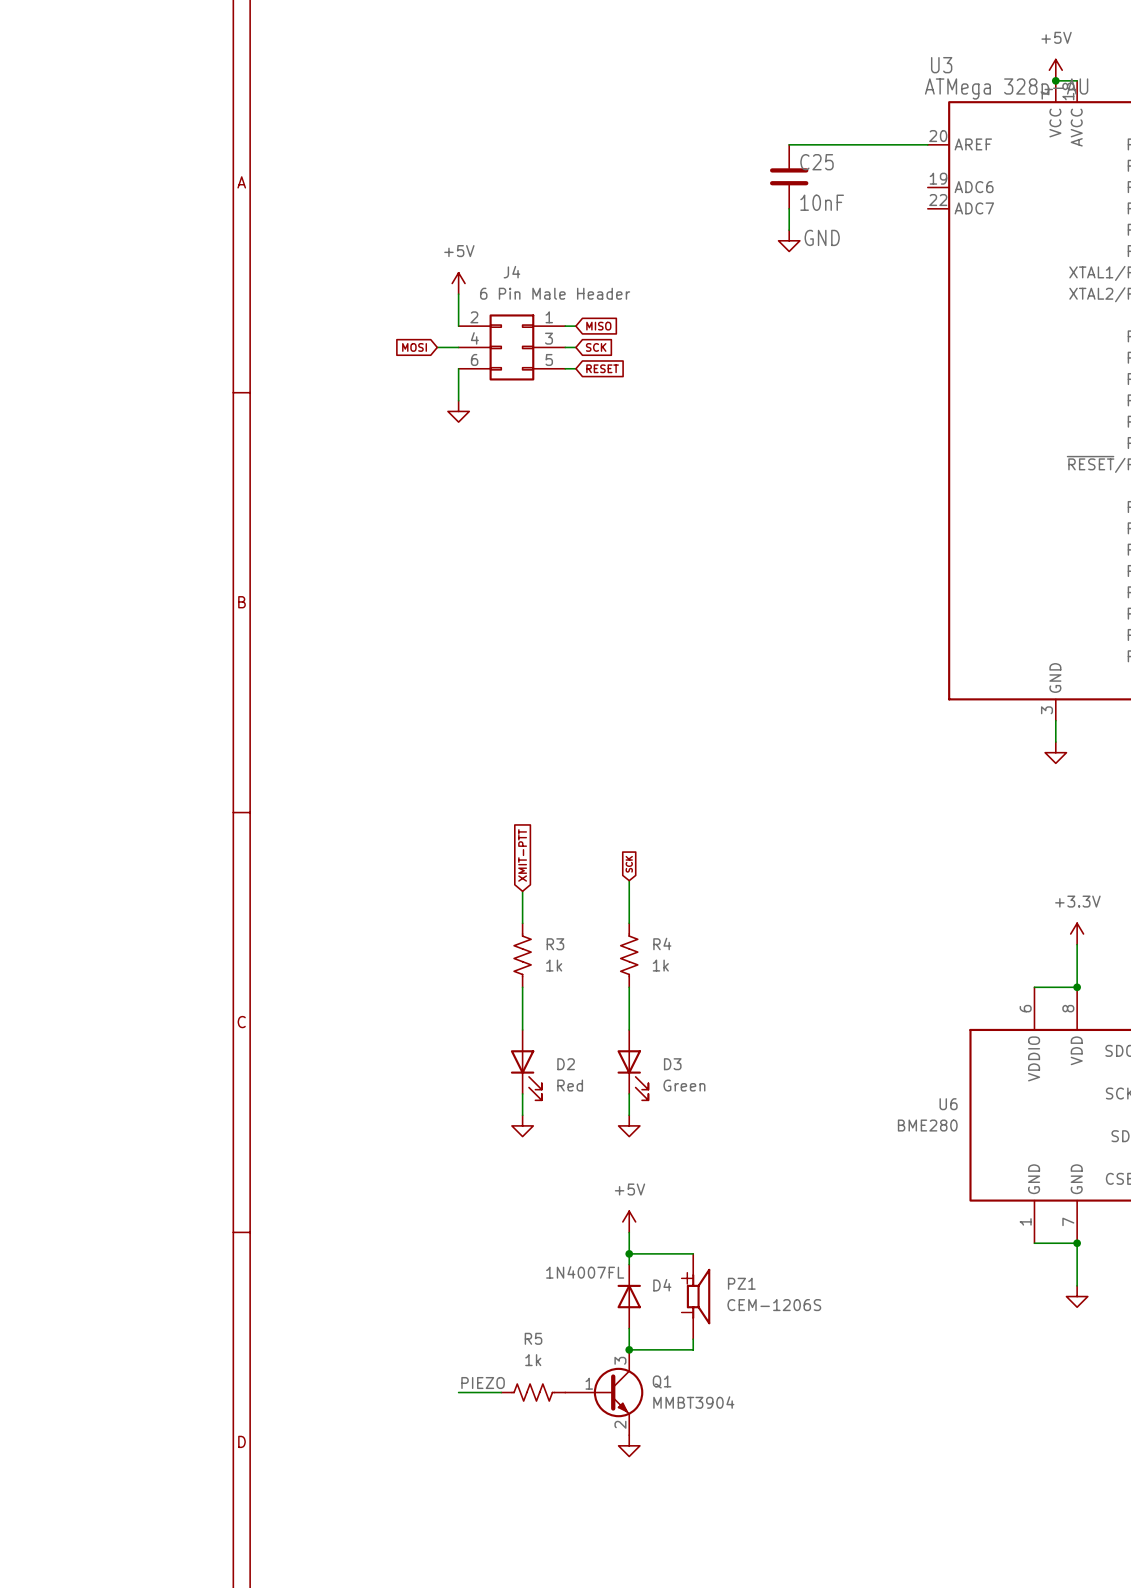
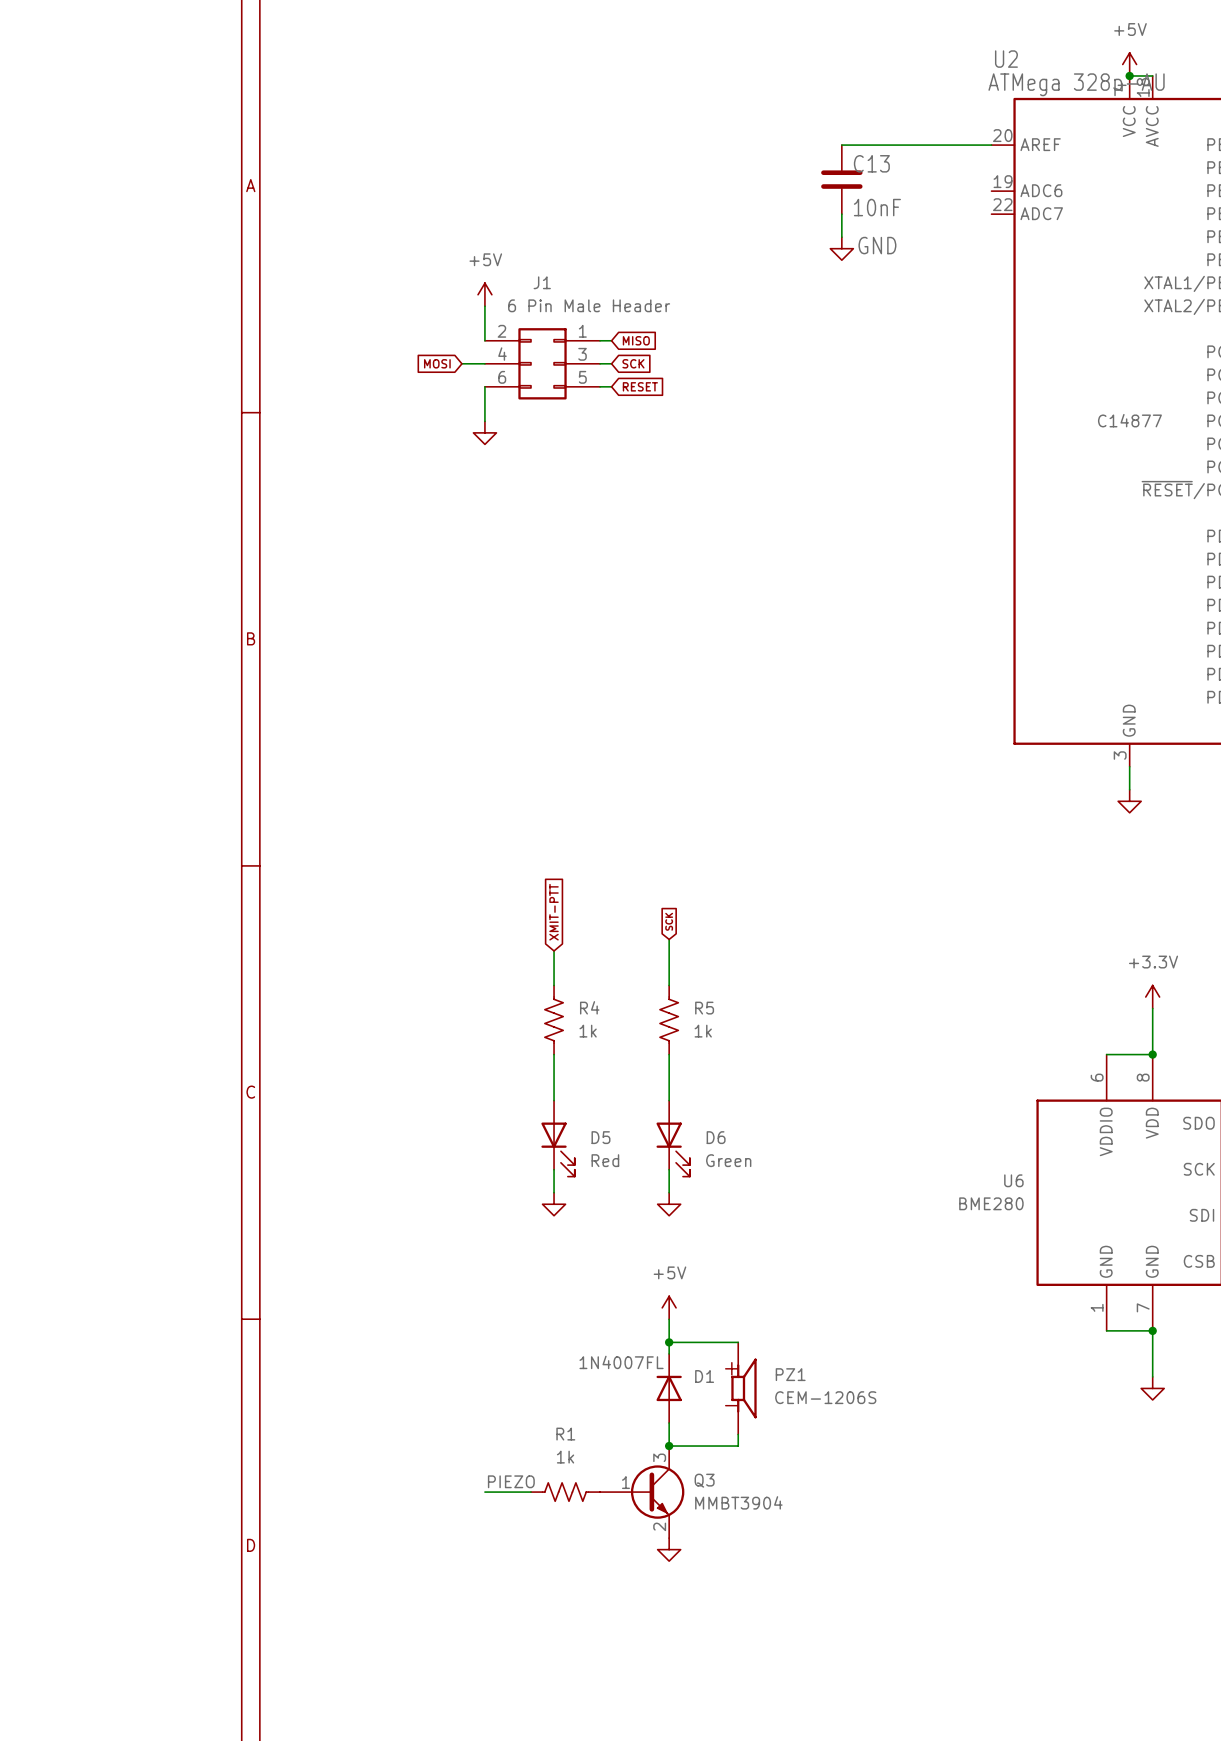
U3 name: U3 (941, 65) -> U2 (1006, 59)
C25 name: C25 (817, 162) -> C13 (871, 163)
J4 name: J4 (511, 272) -> J1 (542, 282)
U3 text: none -> C14877 (1129, 420)
R4 name: R4 (662, 943) -> R5 (704, 1008)
R3 name: R3 (555, 944) -> R4 (589, 1007)
D2 name: D2 (566, 1064) -> D5 (600, 1137)
D3 name: D3 (672, 1064) -> D6 (716, 1137)
D4 name: D4 (662, 1285) -> D1 (704, 1376)
R5 name: R5 (533, 1338) -> R1 (565, 1434)
Q1 name: Q1 (662, 1381) -> Q3 (704, 1480)

